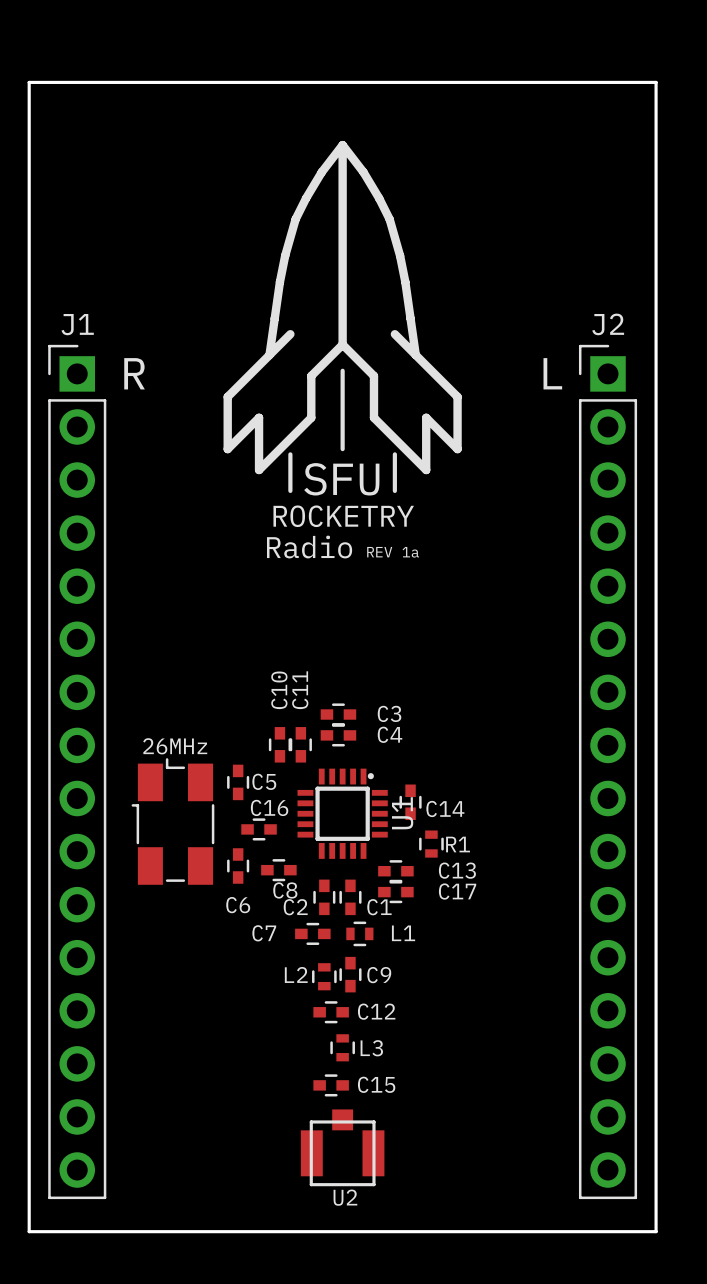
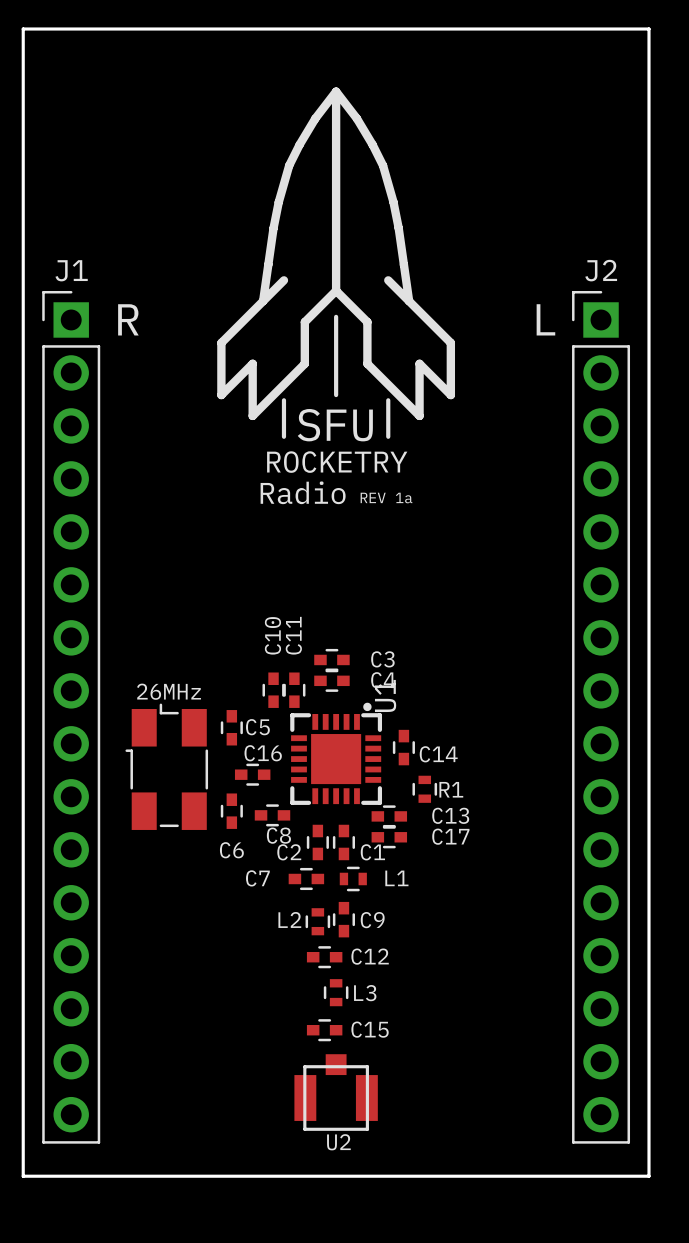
U1 footprint: [297, 768, 388, 859] -> [290, 702, 383, 805]
U1 name position: U1 (402, 813) -> U1 (385, 695)

